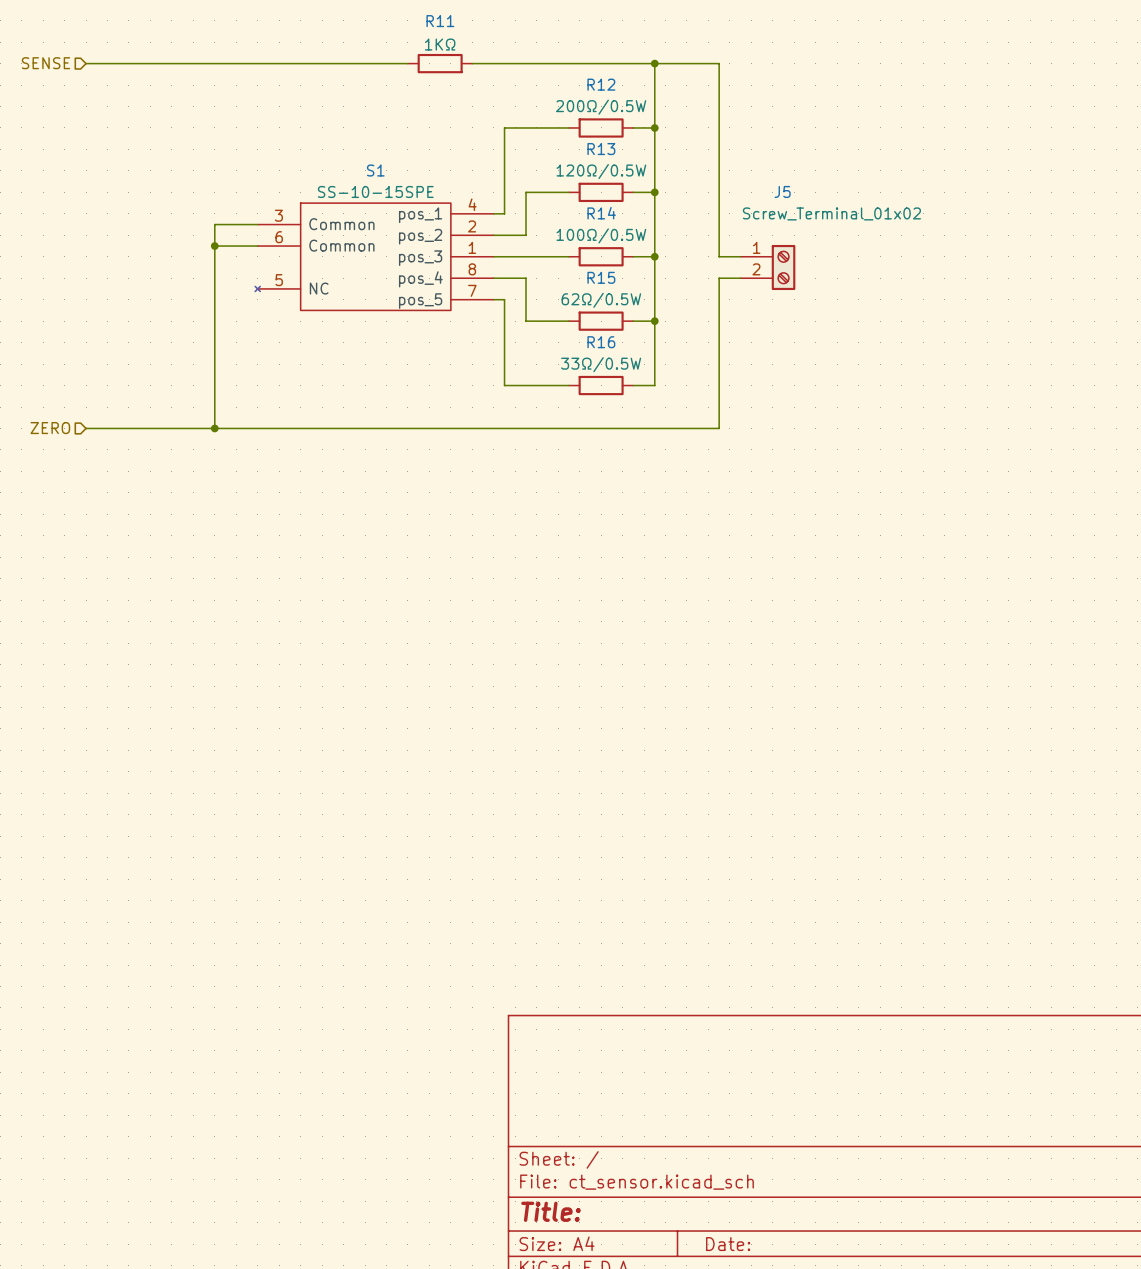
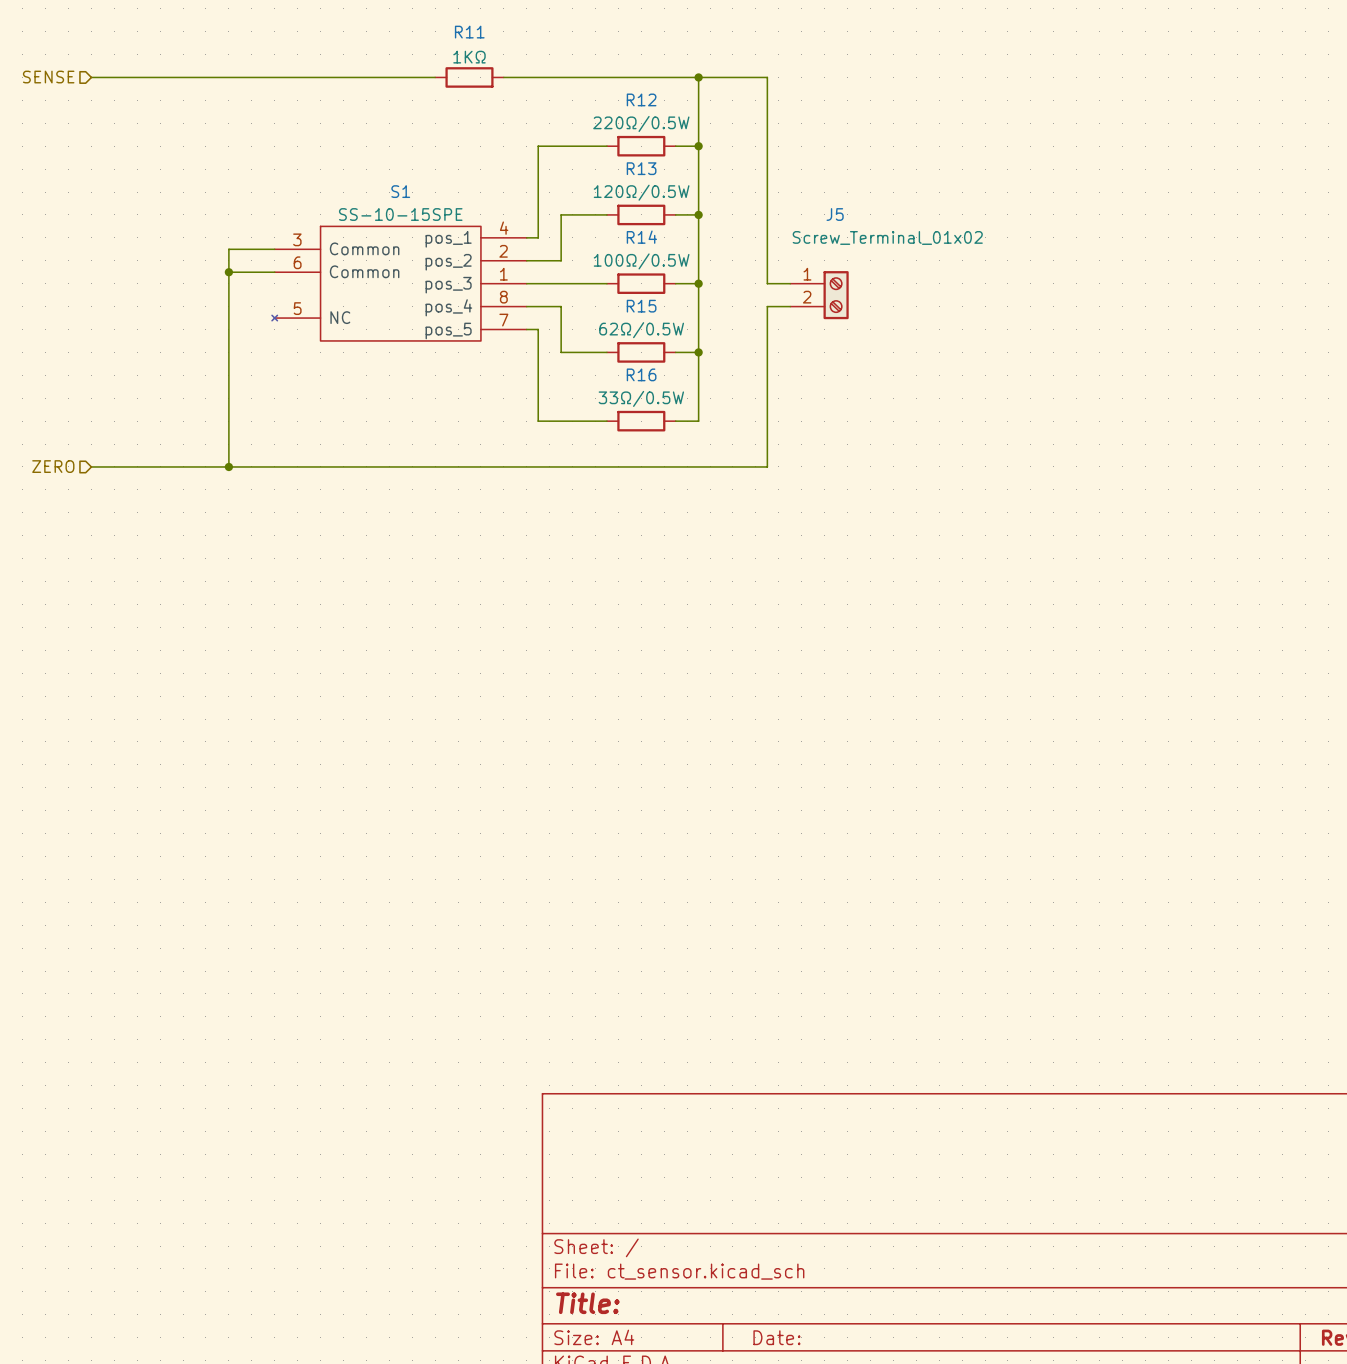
R12 value: 200Ω/0.5W (601, 107) -> 220Ω/0.5W (641, 123)

